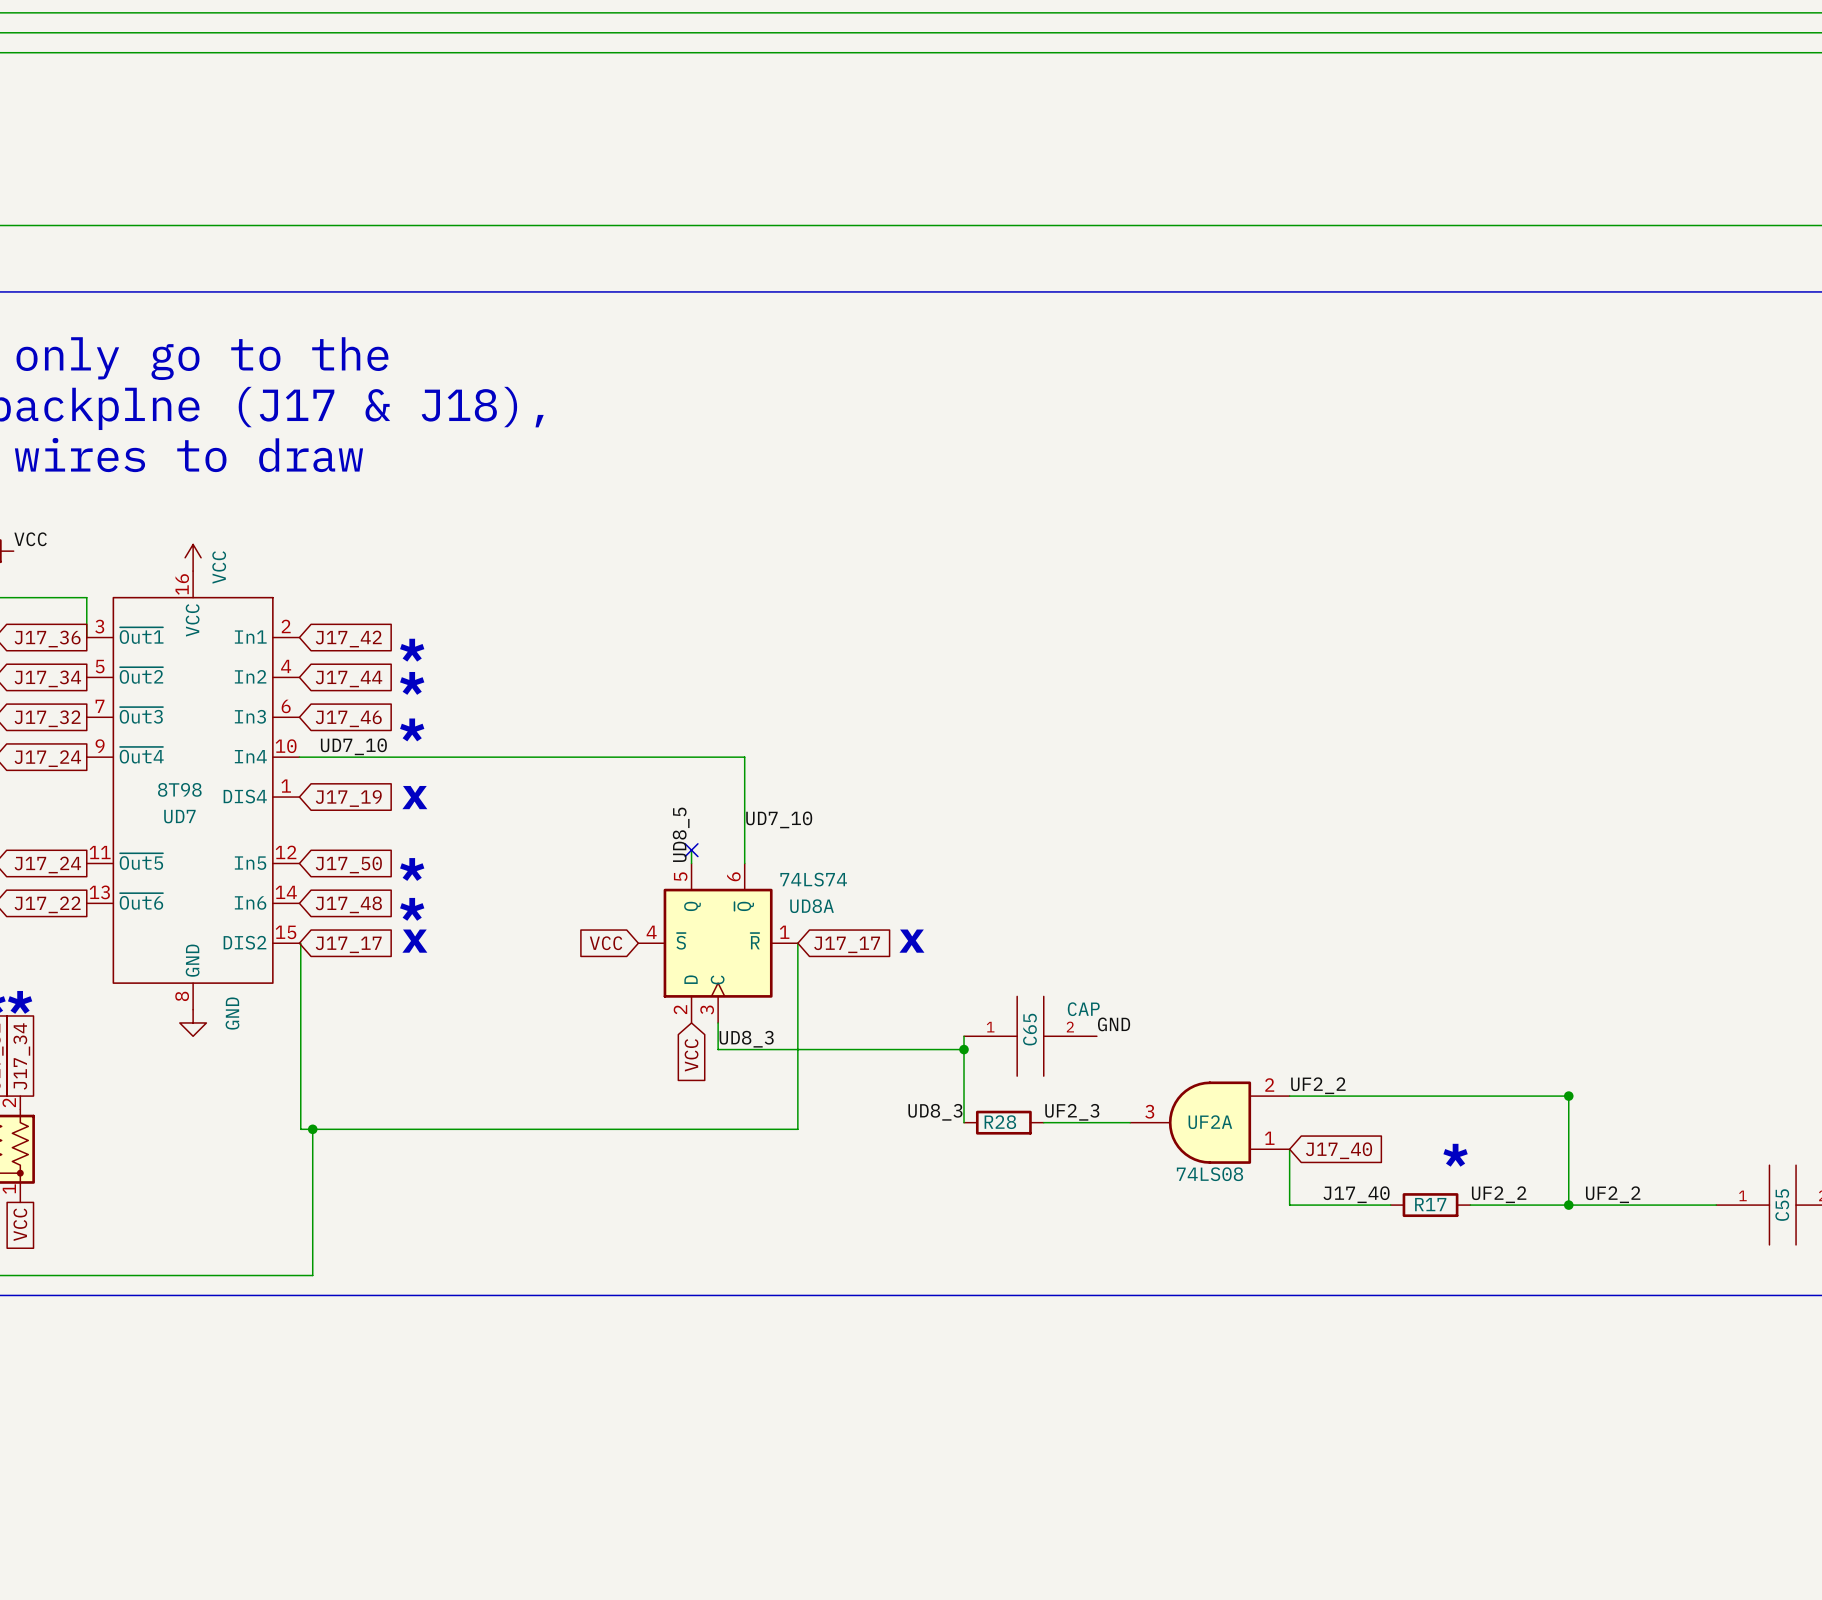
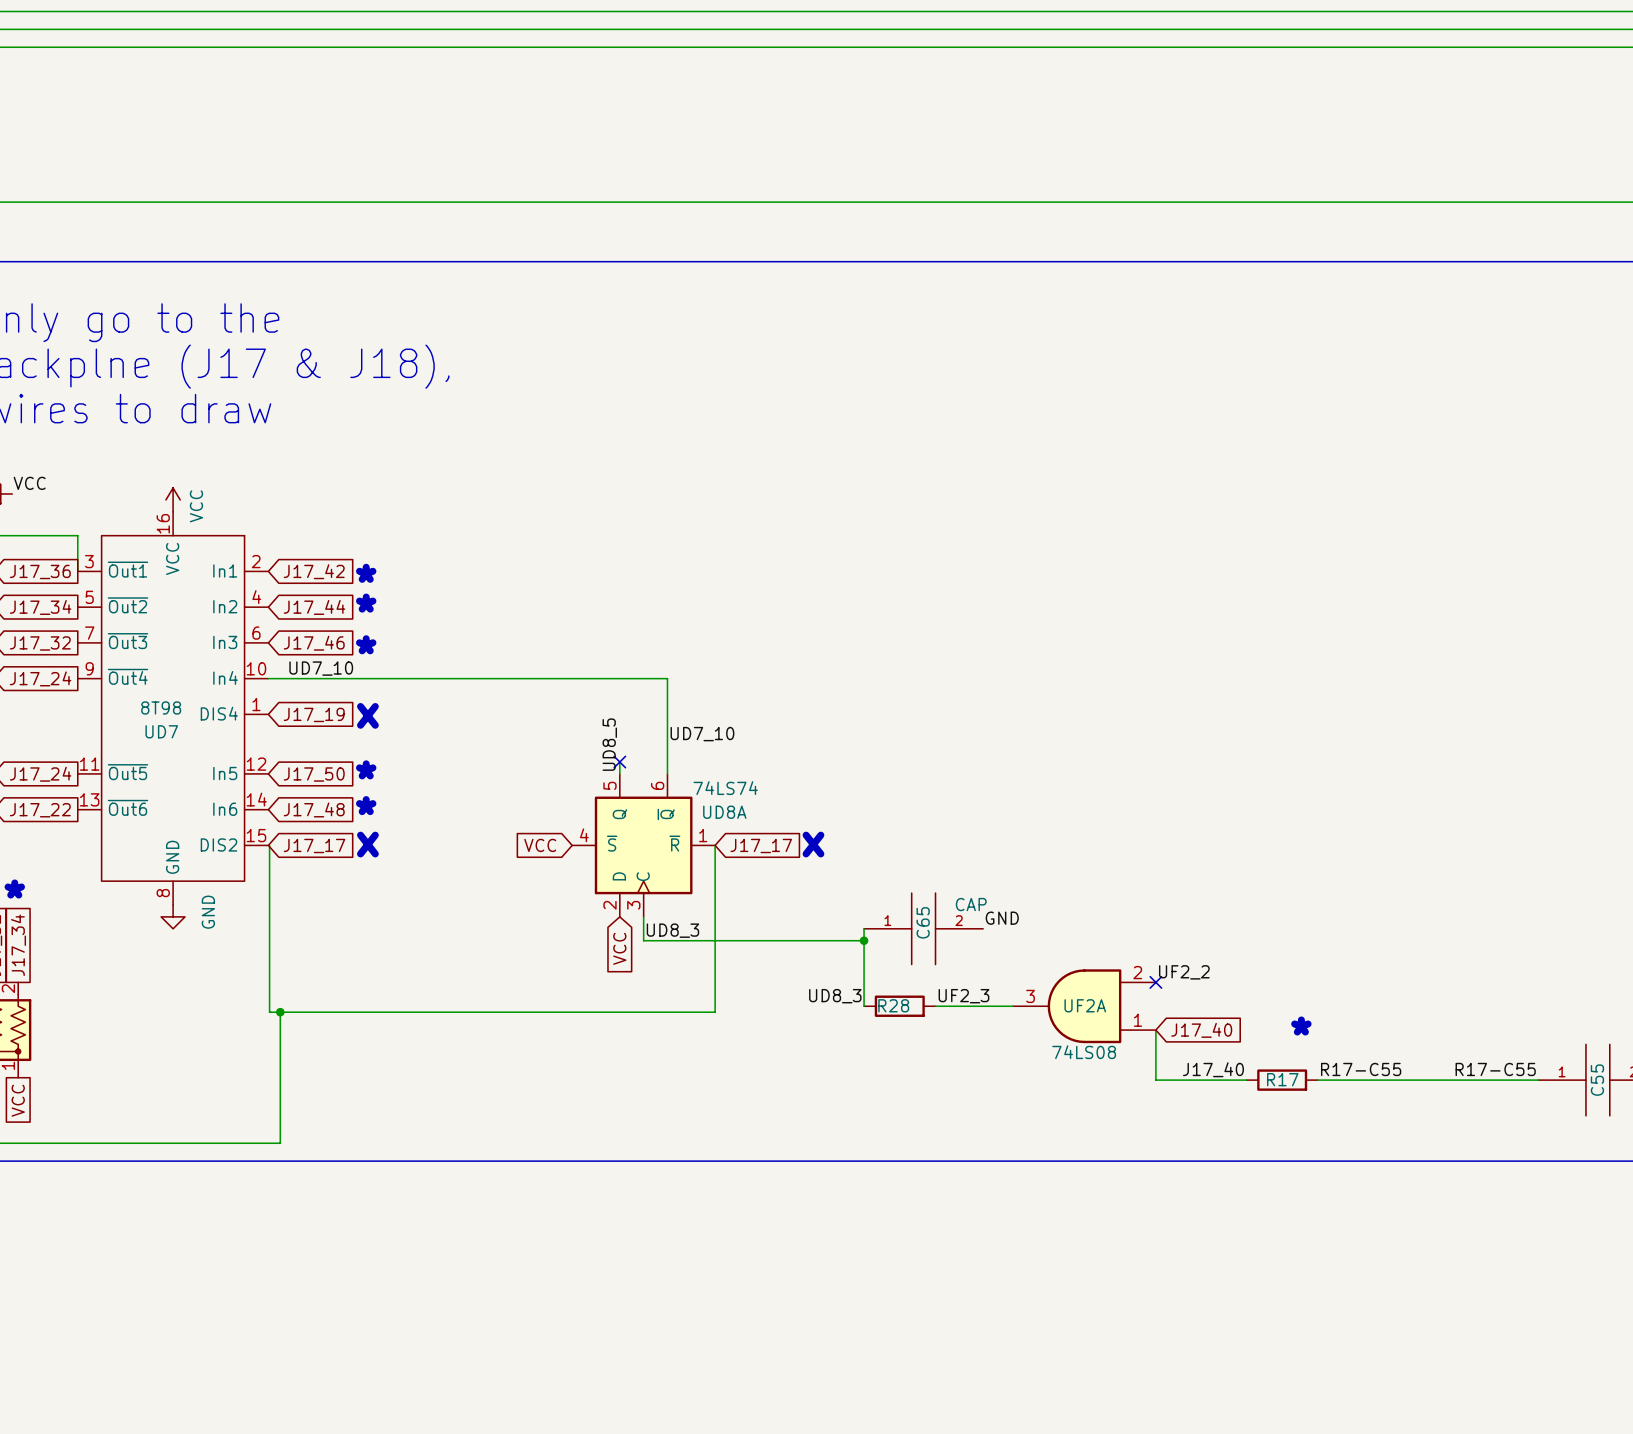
wire: (1568, 1095) (1568, 1205) -> none
wire: (1289, 1096) (1568, 1096) -> none
no-connect mark: none -> (1155, 982)
junction: (1568, 1096) -> none
label: none -> R17-C55 (1495, 1069)
label: UF2_2 (1499, 1194) -> R17-C55 (1361, 1069)
label: UF2_2 (1613, 1194) -> none
junction: (1568, 1205) -> none

